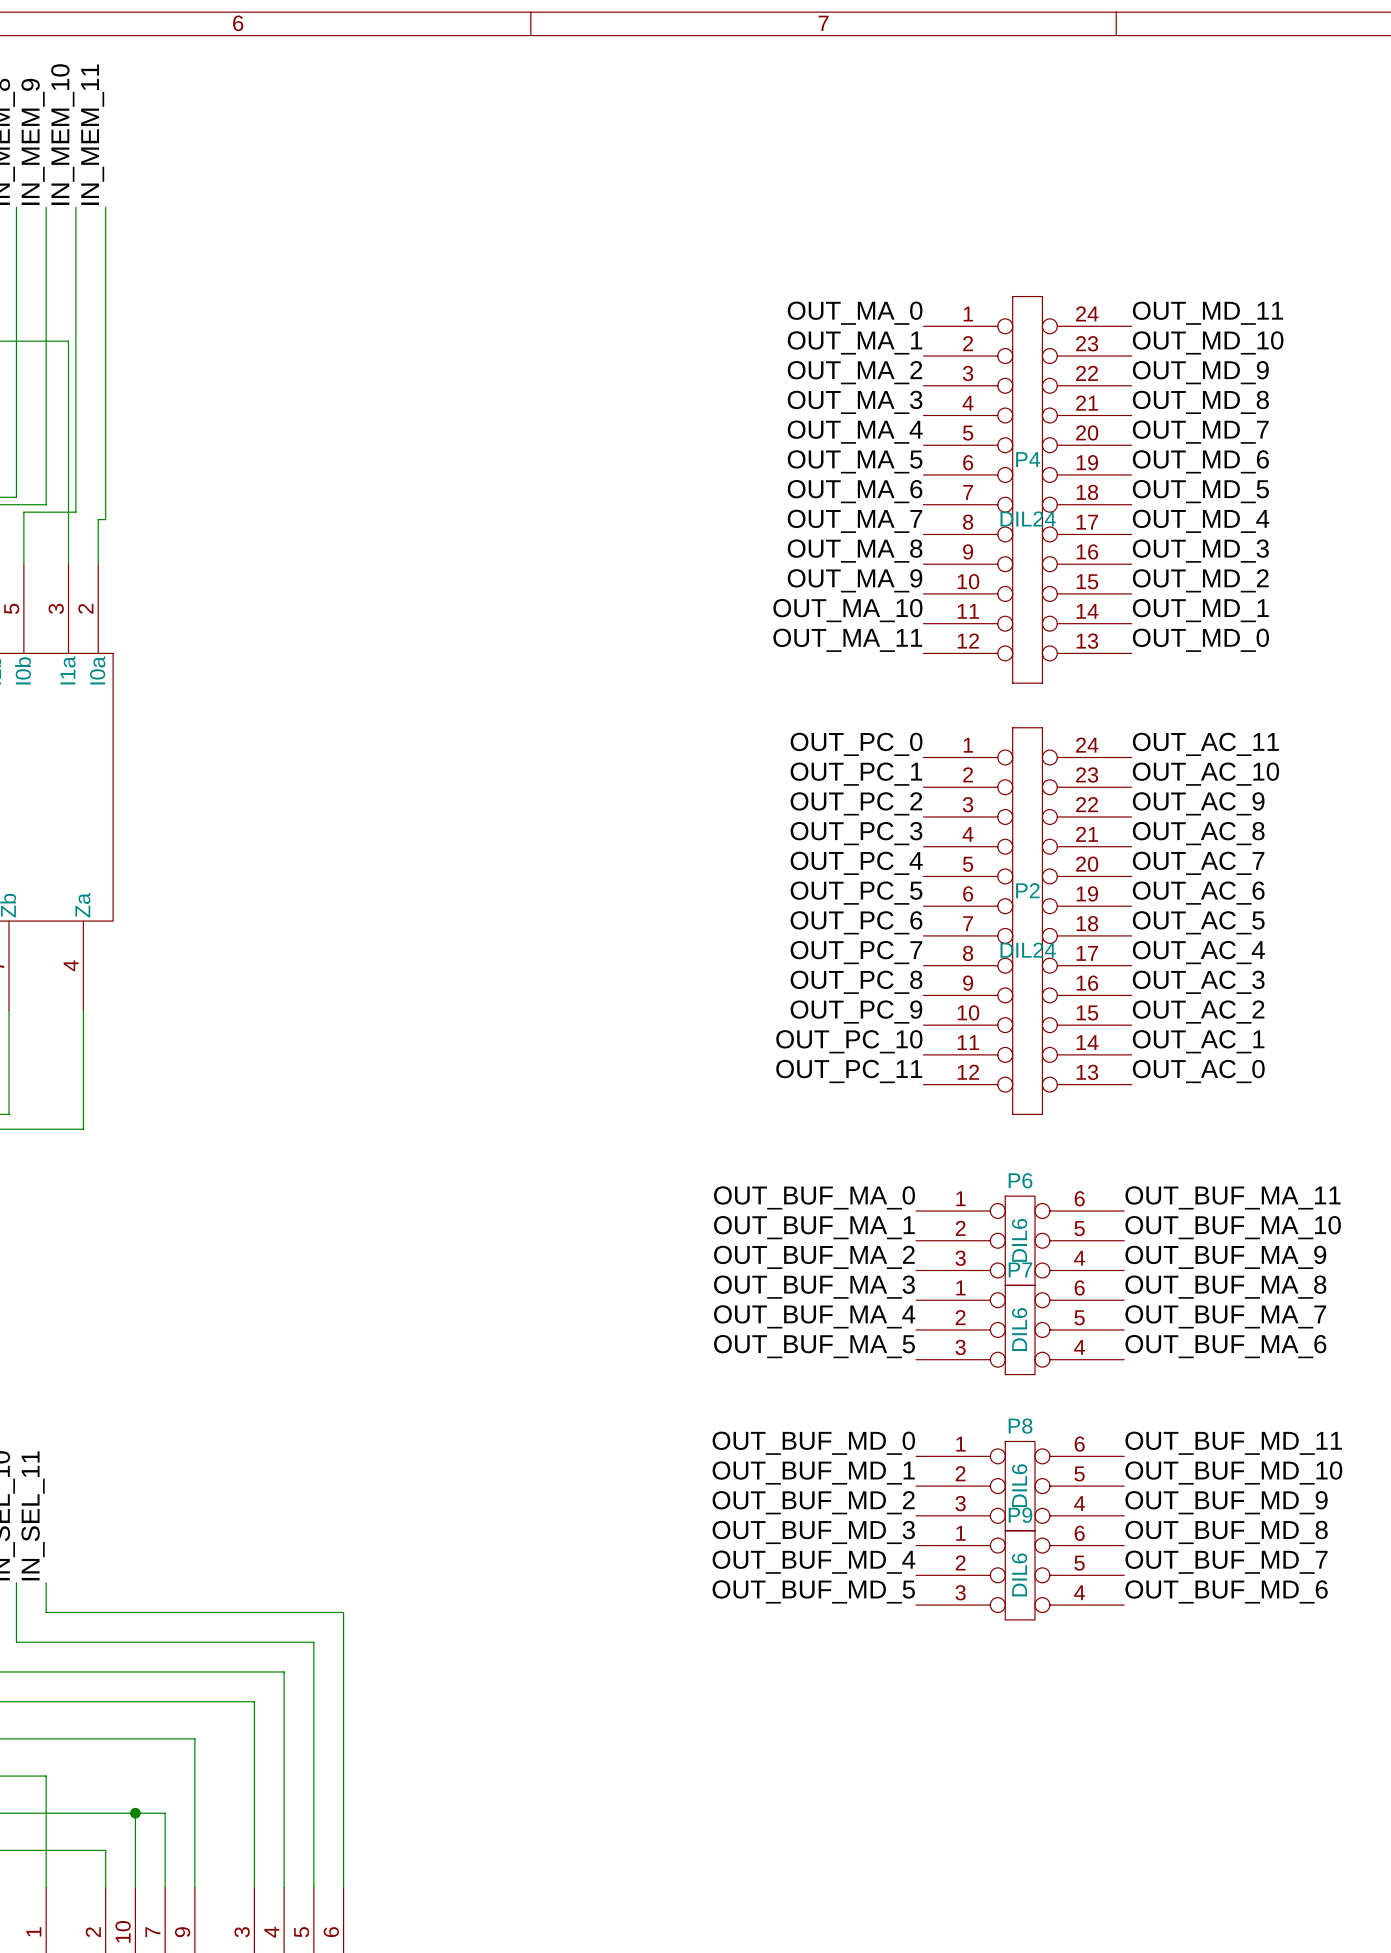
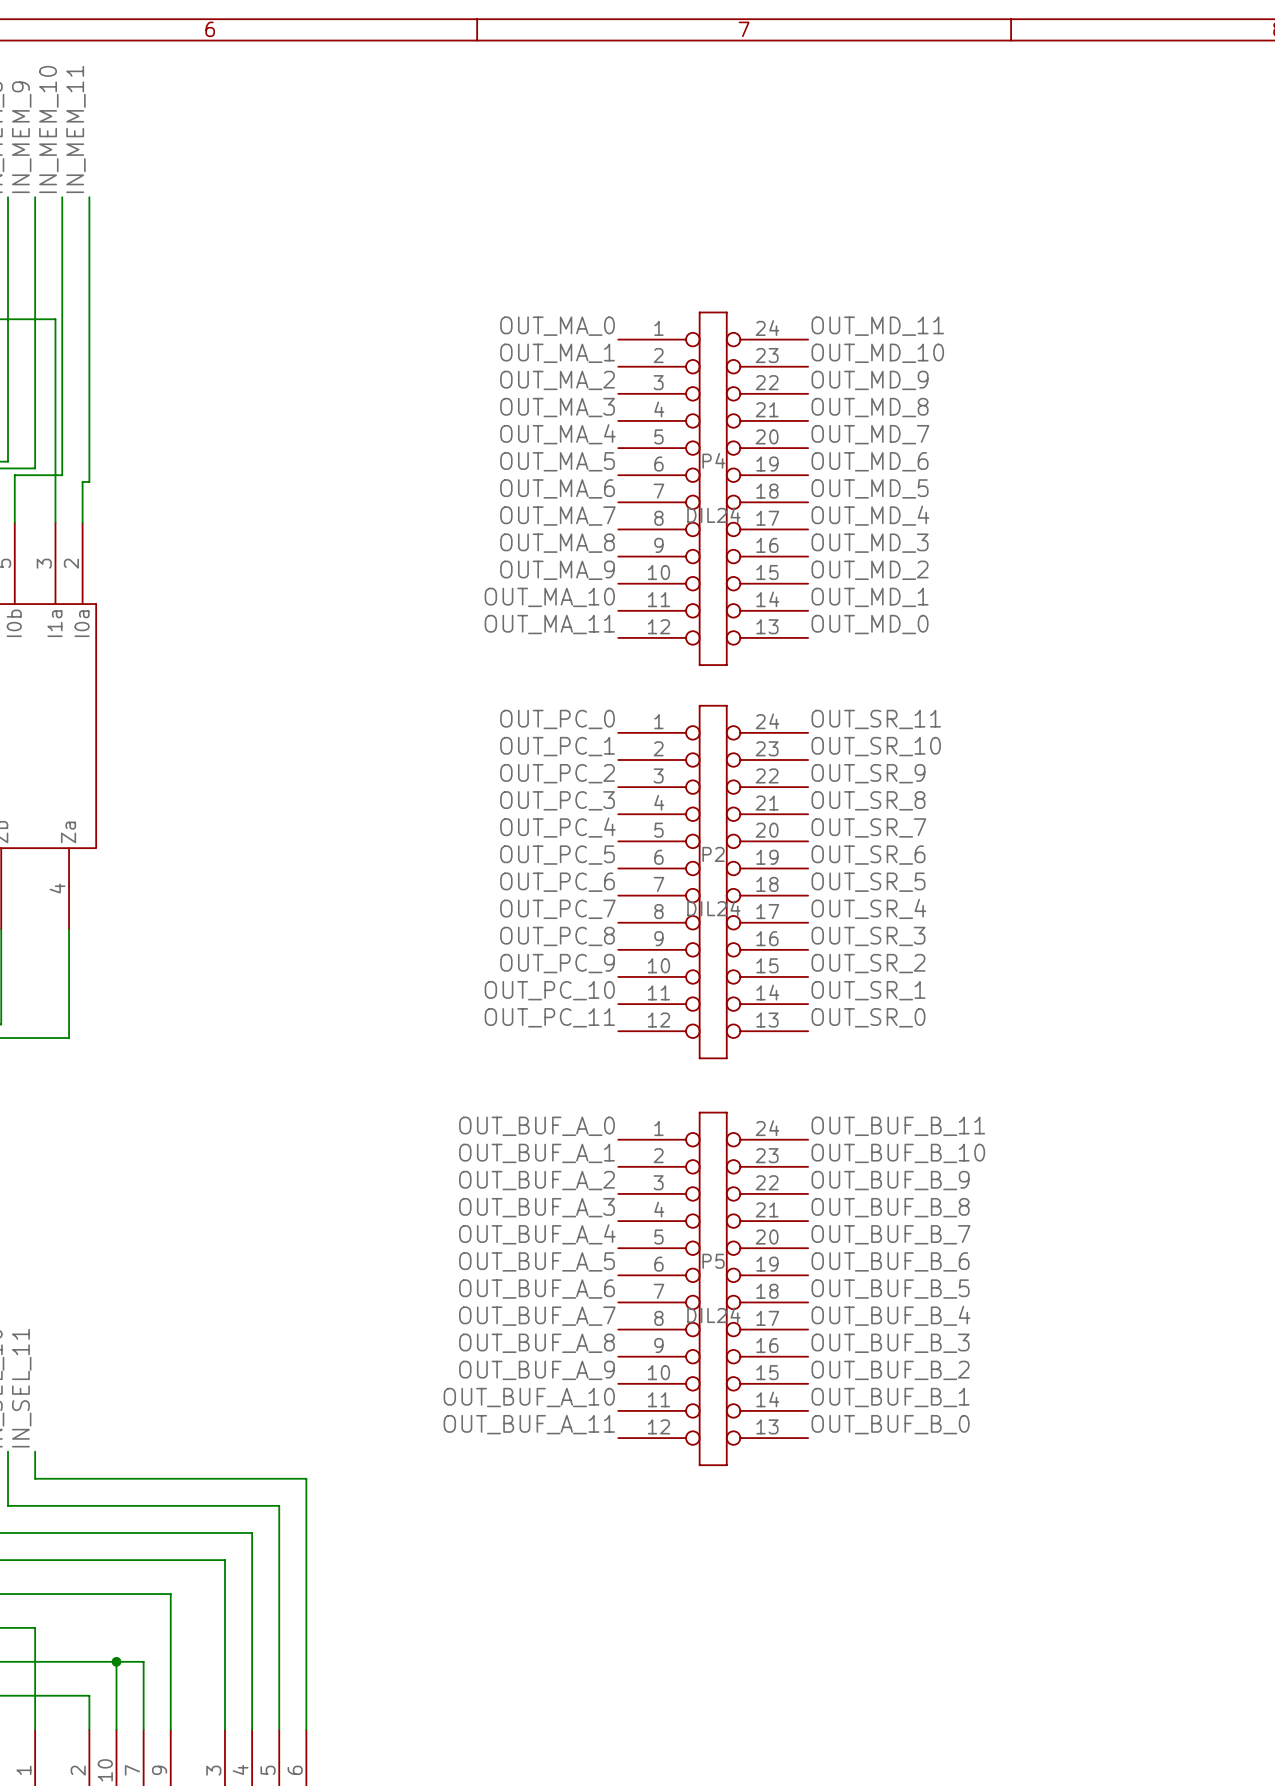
label position: OUT_MA_0 (855, 313) -> OUT_MA_0 (557, 326)
label position: OUT_MD_11 (1208, 313) -> OUT_MD_11 (877, 326)
label position: OUT_MA_1 (854, 342) -> OUT_MA_1 (557, 353)
label position: OUT_MD_10 (1208, 342) -> OUT_MD_10 (877, 353)
label position: OUT_MA_2 (854, 372) -> OUT_MA_2 (557, 380)
label position: OUT_MD_9 (1200, 372) -> OUT_MD_9 (870, 380)
label position: OUT_MA_3 (855, 402) -> OUT_MA_3 (557, 407)
label position: OUT_MD_8 (1200, 402) -> OUT_MD_8 (870, 407)
label position: OUT_MA_4 (855, 432) -> OUT_MA_4 (557, 434)
label position: OUT_MD_7 (1200, 432) -> OUT_MD_7 (870, 434)
label position: OUT_MA_5 (855, 461) -> OUT_MA_5 (557, 461)
label position: OUT_MD_6 (1200, 461) -> OUT_MD_6 (870, 461)
P4 position: (1027, 489) -> (713, 488)
label position: OUT_MA_6 (855, 491) -> OUT_MA_6 (557, 488)
label position: OUT_MD_5 (1200, 491) -> OUT_MD_5 (870, 488)
label position: OUT_MA_7 (854, 521) -> OUT_MA_7 (557, 516)
label position: OUT_MD_4 (1201, 521) -> OUT_MD_4 (870, 515)
label position: OUT_MA_8 (855, 551) -> OUT_MA_8 (557, 543)
label position: OUT_MD_3 (1200, 551) -> OUT_MD_3 (870, 543)
label position: OUT_MA_9 (855, 580) -> OUT_MA_9 (557, 570)
label position: OUT_MD_2 (1200, 580) -> OUT_MD_2 (870, 570)
label position: OUT_MA_10 (847, 610) -> OUT_MA_10 (549, 597)
label position: OUT_MD_1 (1200, 610) -> OUT_MD_1 (870, 597)
label position: OUT_MA_11 (847, 640) -> OUT_MA_11 (549, 624)
label position: OUT_MD_0 (1200, 640) -> OUT_MD_0 (870, 624)
label position: OUT_PC_0 (856, 744) -> OUT_PC_0 (557, 719)
label: OUT_AC_11 (1205, 744) -> none
label position: OUT_PC_1 (856, 774) -> OUT_PC_1 (557, 746)
label: OUT_AC_10 (1205, 774) -> none
label: none -> OUT_SR_11 (876, 719)
label position: OUT_PC_2 (856, 803) -> OUT_PC_2 (557, 773)
label: OUT_AC_9 (1198, 803) -> none
label: none -> OUT_SR_10 (876, 746)
label position: OUT_PC_3 (856, 833) -> OUT_PC_3 (557, 800)
label: OUT_AC_8 (1198, 833) -> none
label: none -> OUT_SR_9 (868, 773)
label position: OUT_PC_4 (856, 863) -> OUT_PC_4 (557, 827)
label: OUT_AC_7 (1198, 863) -> none
label: none -> OUT_SR_8 (868, 800)
label position: OUT_PC_5 (856, 893) -> OUT_PC_5 (557, 855)
label: OUT_AC_6 (1198, 893) -> none
label: none -> OUT_SR_7 (868, 827)
P2 position: (1027, 921) -> (713, 882)
label position: OUT_PC_6 (856, 922) -> OUT_PC_6 (557, 882)
label: OUT_AC_5 (1198, 922) -> none
label: none -> OUT_SR_6 (868, 855)
label position: OUT_PC_7 (856, 952) -> OUT_PC_7 (557, 909)
label: OUT_AC_4 (1198, 952) -> none
label: none -> OUT_SR_5 (868, 882)
label position: OUT_PC_8 (856, 982) -> OUT_PC_8 (557, 936)
label: OUT_AC_3 (1198, 982) -> none
label: none -> OUT_SR_4 (868, 908)
label position: OUT_PC_9 (856, 1012) -> OUT_PC_9 (557, 963)
label: OUT_AC_2 (1198, 1012) -> none
label: none -> OUT_SR_3 (868, 936)
label position: OUT_PC_10 (849, 1041) -> OUT_PC_10 (549, 990)
label: OUT_AC_1 (1198, 1041) -> none
label: none -> OUT_SR_2 (868, 963)
label position: OUT_PC_11 (849, 1071) -> OUT_PC_11 (549, 1017)
label: OUT_AC_0 (1198, 1071) -> none
label: none -> OUT_SR_1 (868, 990)
label: none -> OUT_SR_0 (868, 1017)
label: OUT_BUF_MA_0 (814, 1197) -> none
label: OUT_BUF_MA_11 (1233, 1197) -> none
label: none -> OUT_BUF_A_0 (536, 1126)
label: OUT_BUF_MA_1 (814, 1227) -> none
label: none -> OUT_BUF_B_11 (898, 1126)
label: OUT_BUF_MA_10 (1233, 1227) -> none
P6: DIL6 (1020, 1240) -> none
label: none -> OUT_BUF_A_1 (536, 1153)
label: OUT_BUF_MA_2 (814, 1257) -> none
label: none -> OUT_BUF_B_10 (898, 1153)
label: OUT_BUF_MA_9 (1225, 1257) -> none
label: none -> OUT_BUF_A_2 (536, 1180)
label: OUT_BUF_MA_3 (814, 1287) -> none
label: none -> OUT_BUF_B_9 (890, 1180)
label: OUT_BUF_MA_8 (1225, 1287) -> none
label: none -> OUT_BUF_A_3 (536, 1207)
label: OUT_BUF_MA_4 (814, 1316) -> none
label: none -> OUT_BUF_B_8 (890, 1207)
label: OUT_BUF_MA_7 (1225, 1316) -> none
P7: DIL6 (1020, 1329) -> none
label: none -> OUT_BUF_A_4 (537, 1234)
label: OUT_BUF_MA_5 (814, 1346) -> none
label: none -> OUT_BUF_B_7 (890, 1234)
label: OUT_BUF_MA_6 (1225, 1346) -> none
label: none -> OUT_BUF_A_5 (536, 1261)
label: none -> OUT_BUF_B_6 (890, 1261)
P5: none -> DIL24 (713, 1288)
label: none -> OUT_BUF_A_6 (536, 1289)
label: none -> OUT_BUF_B_5 (890, 1289)
label: none -> OUT_BUF_A_7 (537, 1316)
label: none -> OUT_BUF_B_4 (890, 1315)
label: OUT_BUF_MD_0 (813, 1443) -> none
label: OUT_BUF_MD_11 (1233, 1443) -> none
label: none -> OUT_BUF_A_8 (536, 1343)
label: none -> OUT_BUF_B_3 (890, 1343)
label: OUT_BUF_MD_1 (813, 1472) -> none
label: OUT_BUF_MD_10 (1233, 1472) -> none
P8: DIL6 (1020, 1486) -> none
label: none -> OUT_BUF_A_9 (536, 1370)
label: none -> OUT_BUF_B_2 (890, 1370)
label: OUT_BUF_MD_2 (813, 1502) -> none
label: OUT_BUF_MD_9 (1226, 1502) -> none
label: none -> OUT_BUF_A_10 (529, 1397)
label: none -> OUT_BUF_B_1 (890, 1397)
label: OUT_BUF_MD_3 (813, 1532) -> none
label: OUT_BUF_MD_8 (1226, 1532) -> none
label: none -> OUT_BUF_A_11 (529, 1424)
label: none -> OUT_BUF_B_0 (890, 1424)
label: OUT_BUF_MD_4 (813, 1562) -> none
label: OUT_BUF_MD_7 (1226, 1562) -> none
P9: DIL6 (1020, 1575) -> none
label: OUT_BUF_MD_5 (813, 1591) -> none
label: OUT_BUF_MD_6 (1226, 1591) -> none

